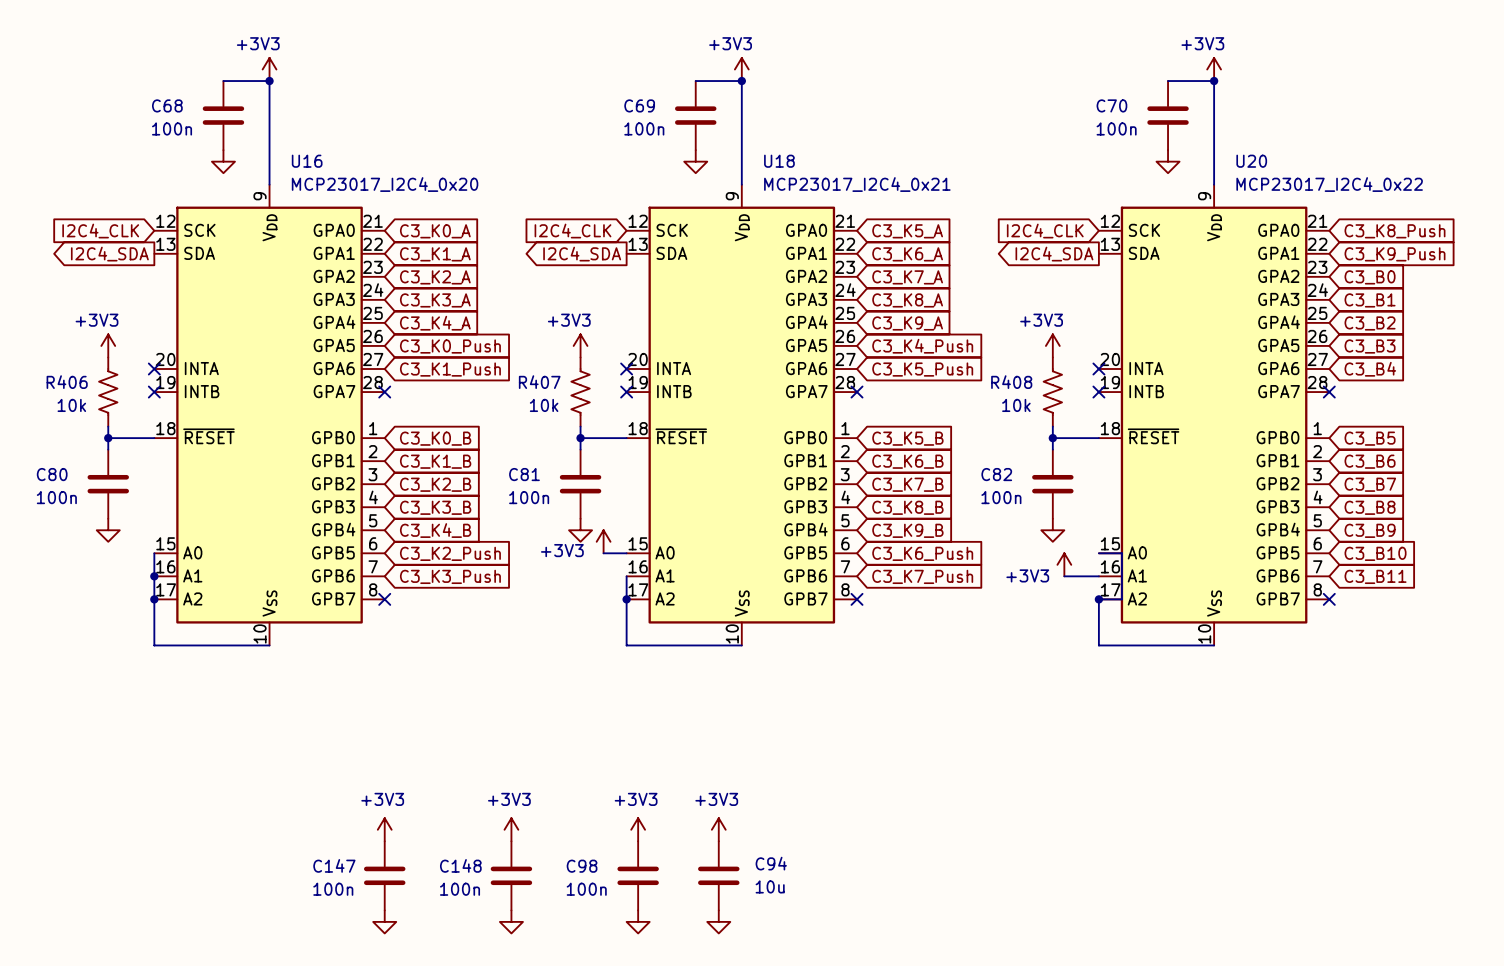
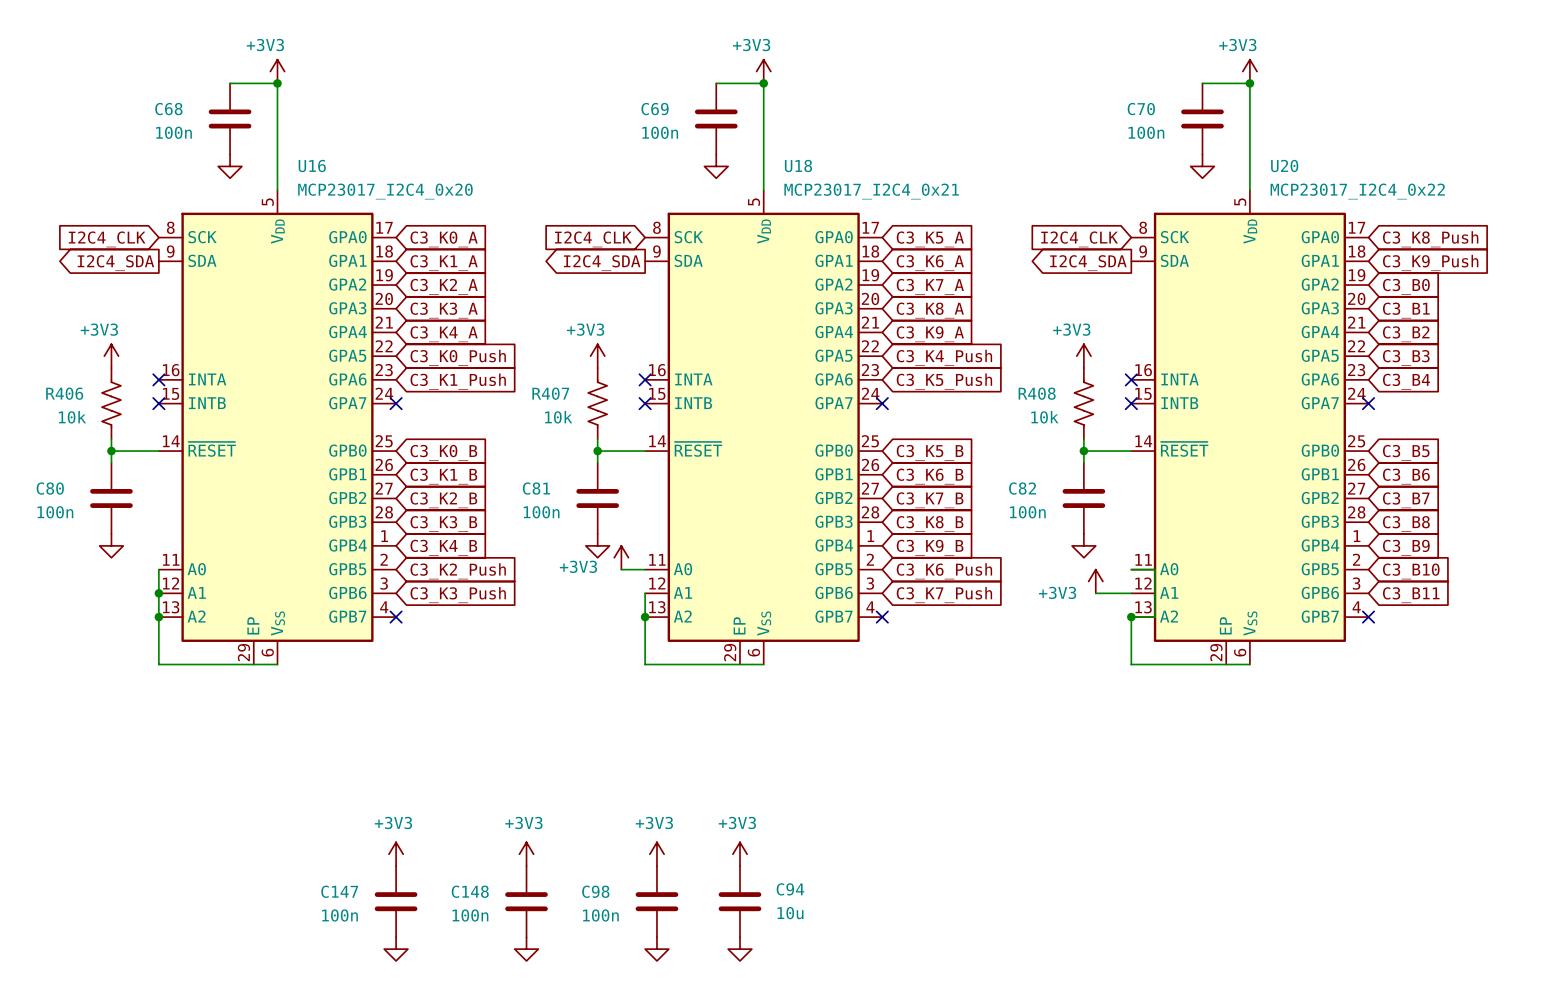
U16 symbol: [154, 184, 385, 646] -> [158, 190, 397, 665]
U18 symbol: [626, 184, 858, 646] -> [645, 190, 883, 665]
U20 symbol: [1098, 184, 1330, 646] -> [1131, 190, 1369, 665]

